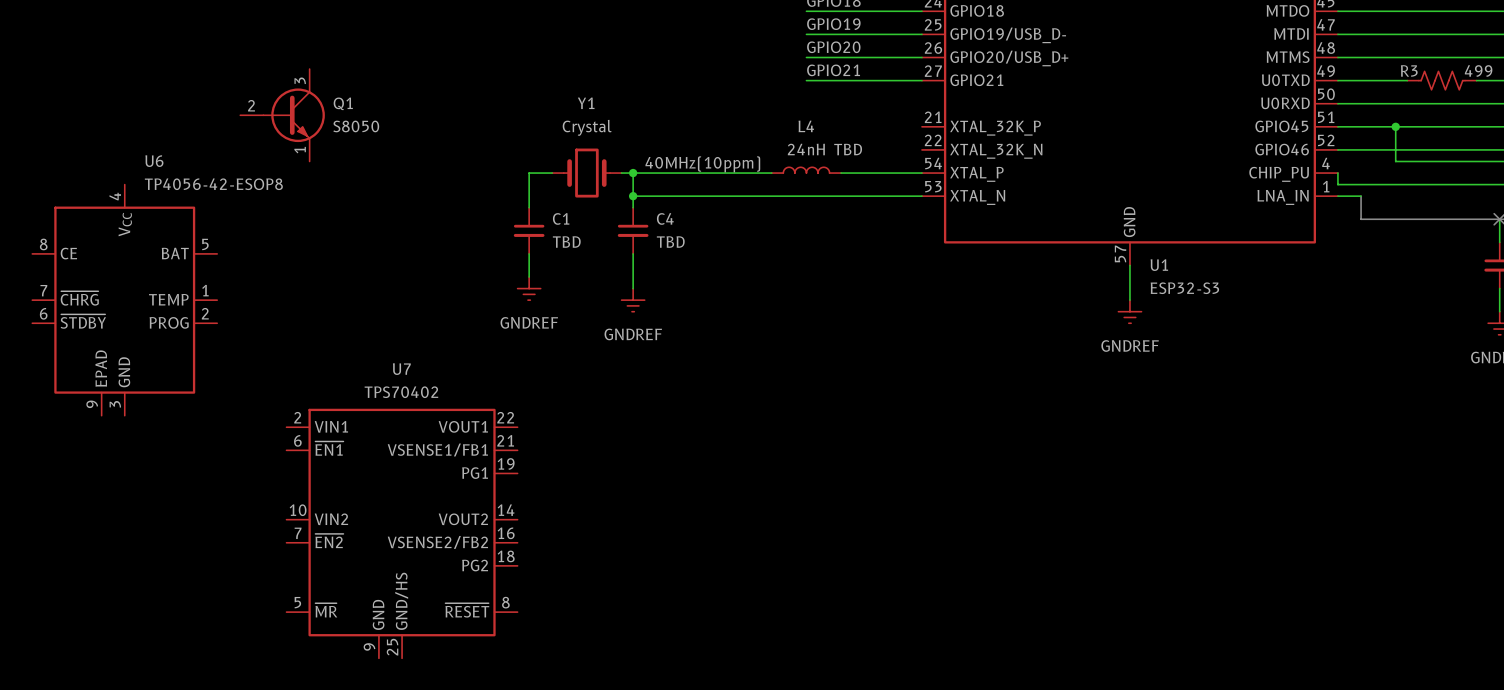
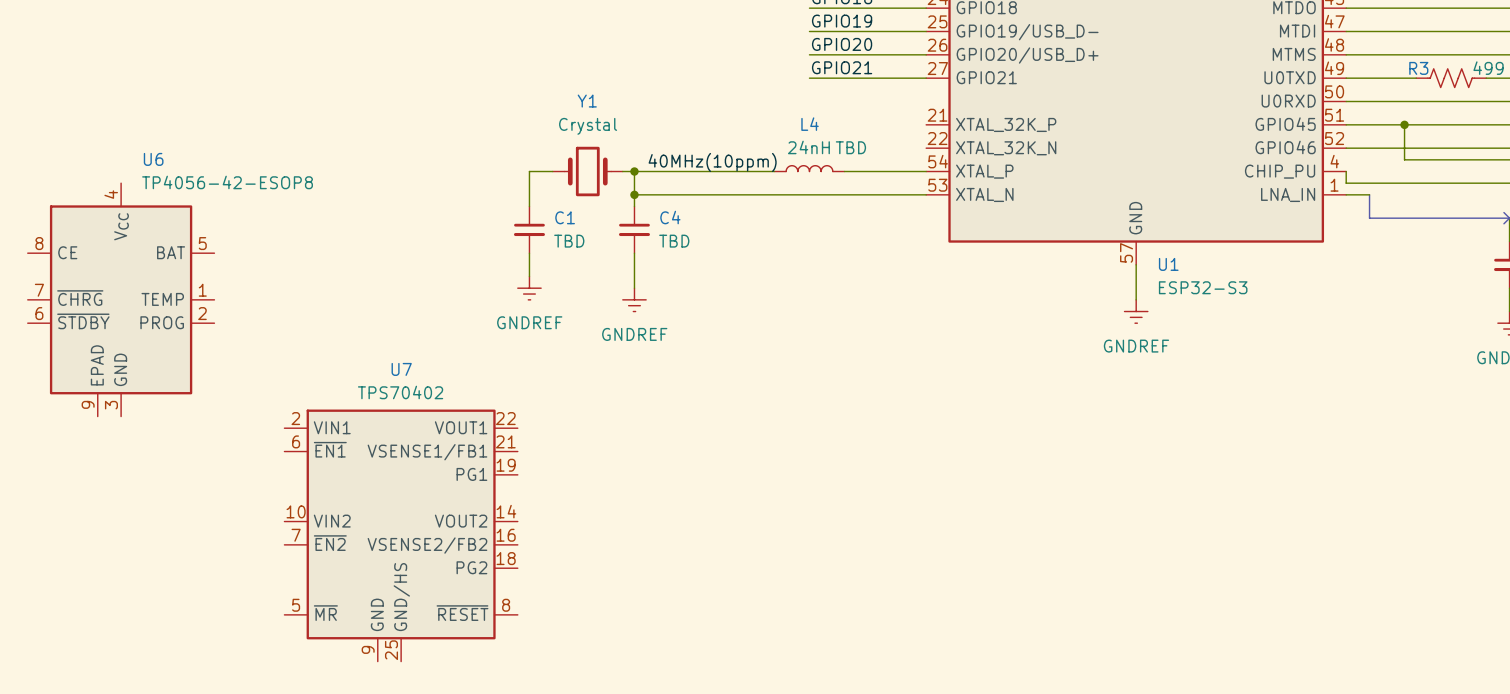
Q1: S8050 (282, 115) -> none

